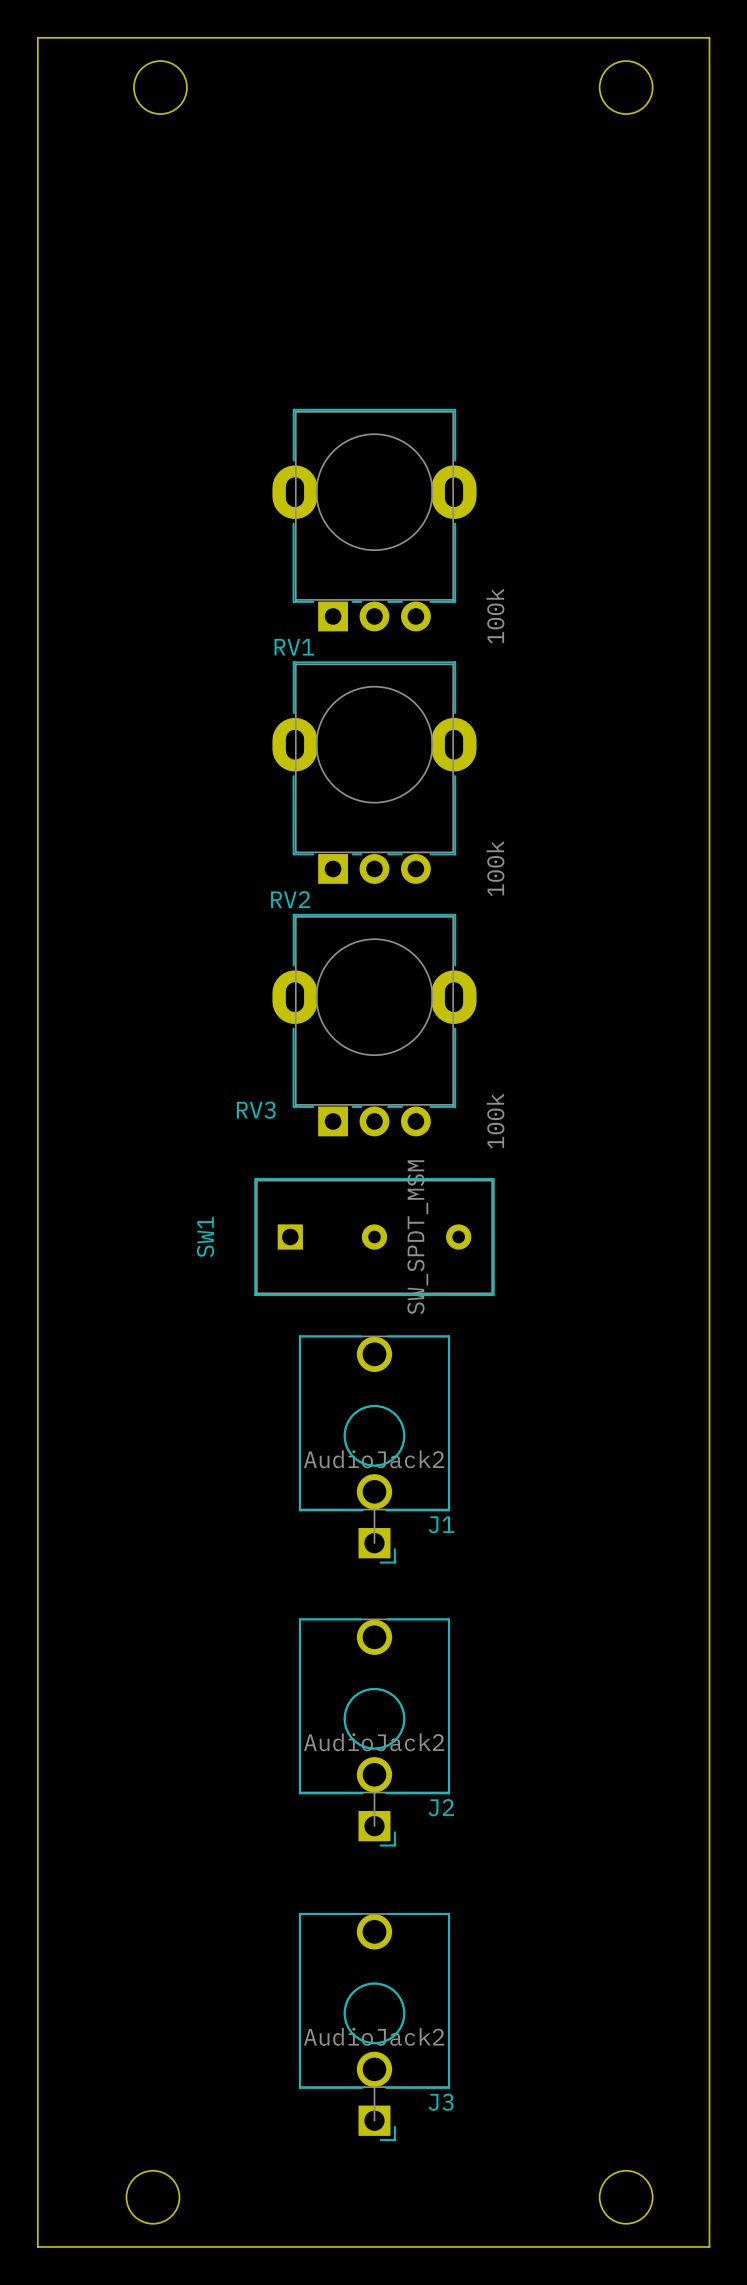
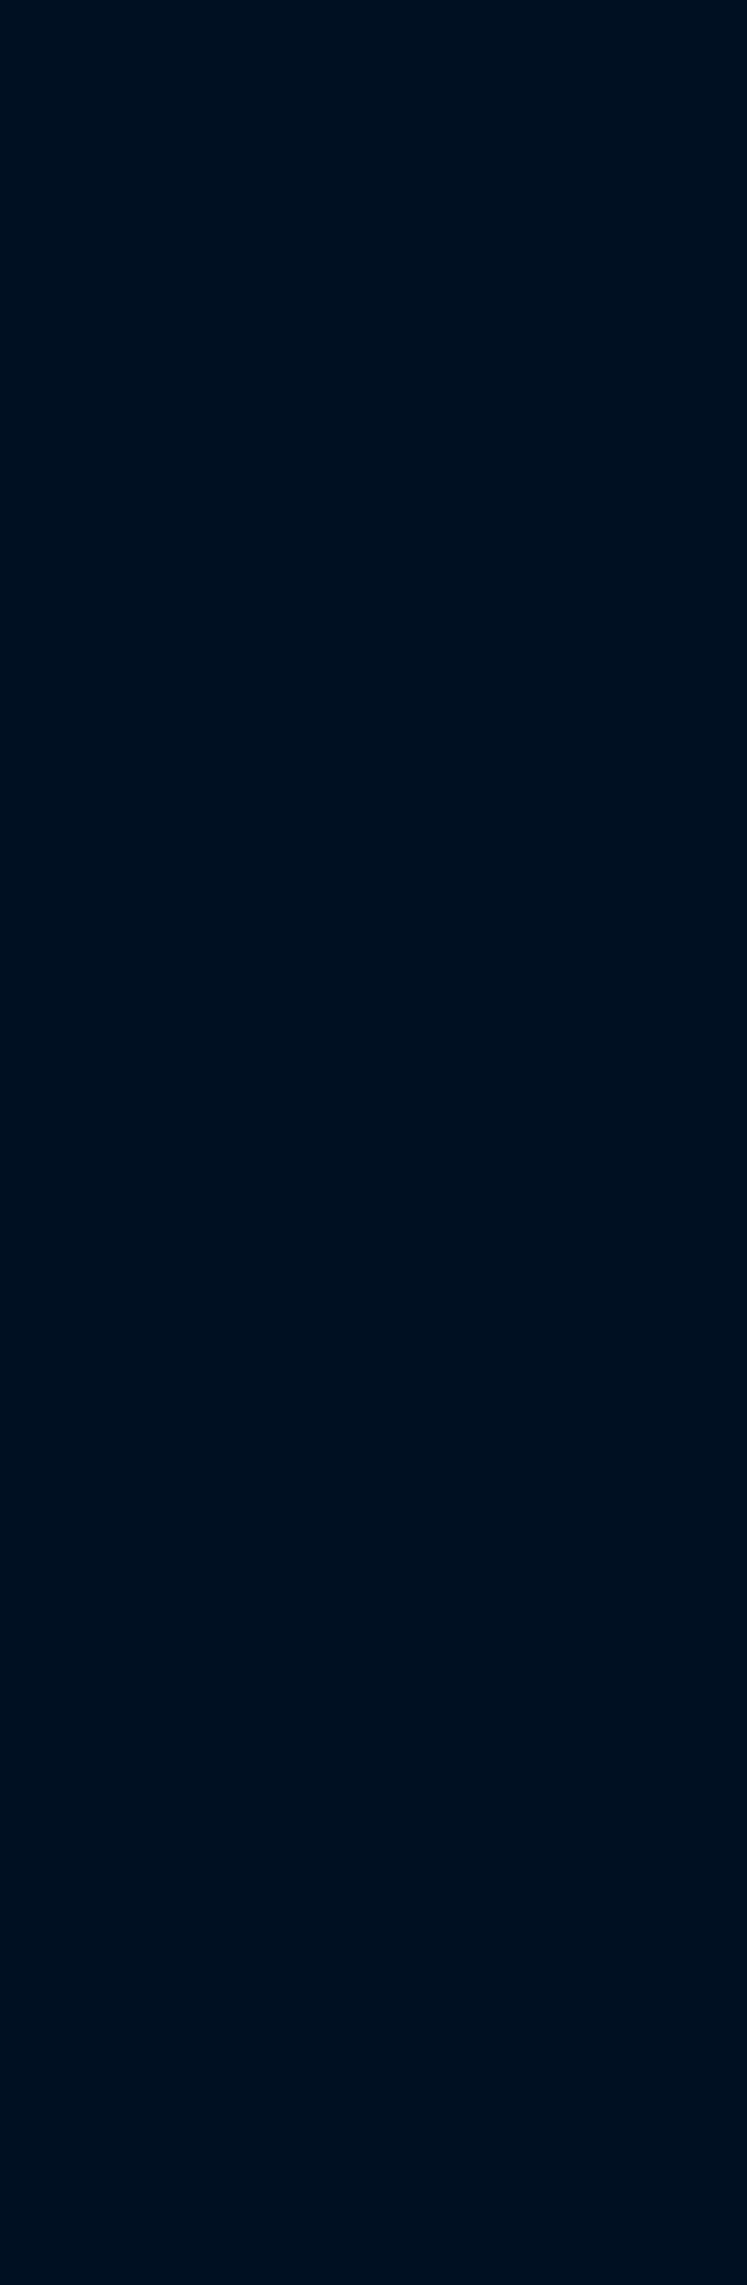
board edge: (37, 37) (709, 37) (709, 2246) (37, 2246) (37, 37) -> none
round board edge: [133, 60, 188, 115] -> none
round board edge: [598, 60, 654, 115] -> none
RV1: 100k (374, 520) -> none
RV2: 100k (374, 772) -> none
RV3: 100k (374, 1025) -> none
SW1: SW_SPDT_MSM (374, 1237) -> none
J1: AudioJack2 (374, 1449) -> none
J2: AudioJack2 (374, 1732) -> none
J3: AudioJack2 (374, 2027) -> none
round board edge: [125, 2169, 181, 2225] -> none
round board edge: [598, 2169, 654, 2225] -> none

